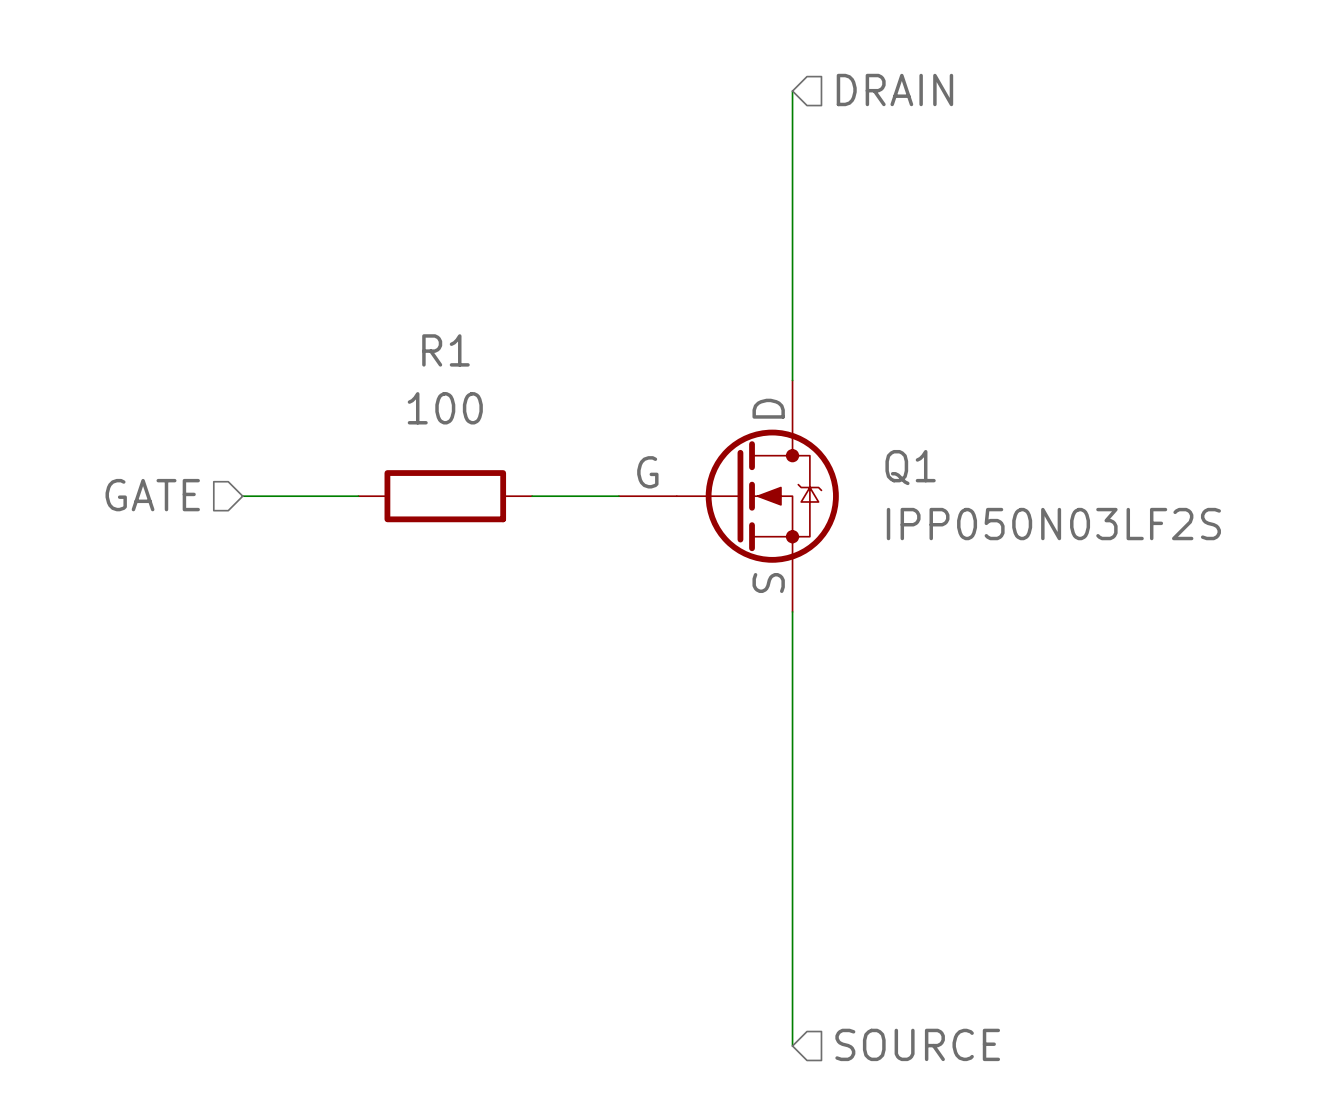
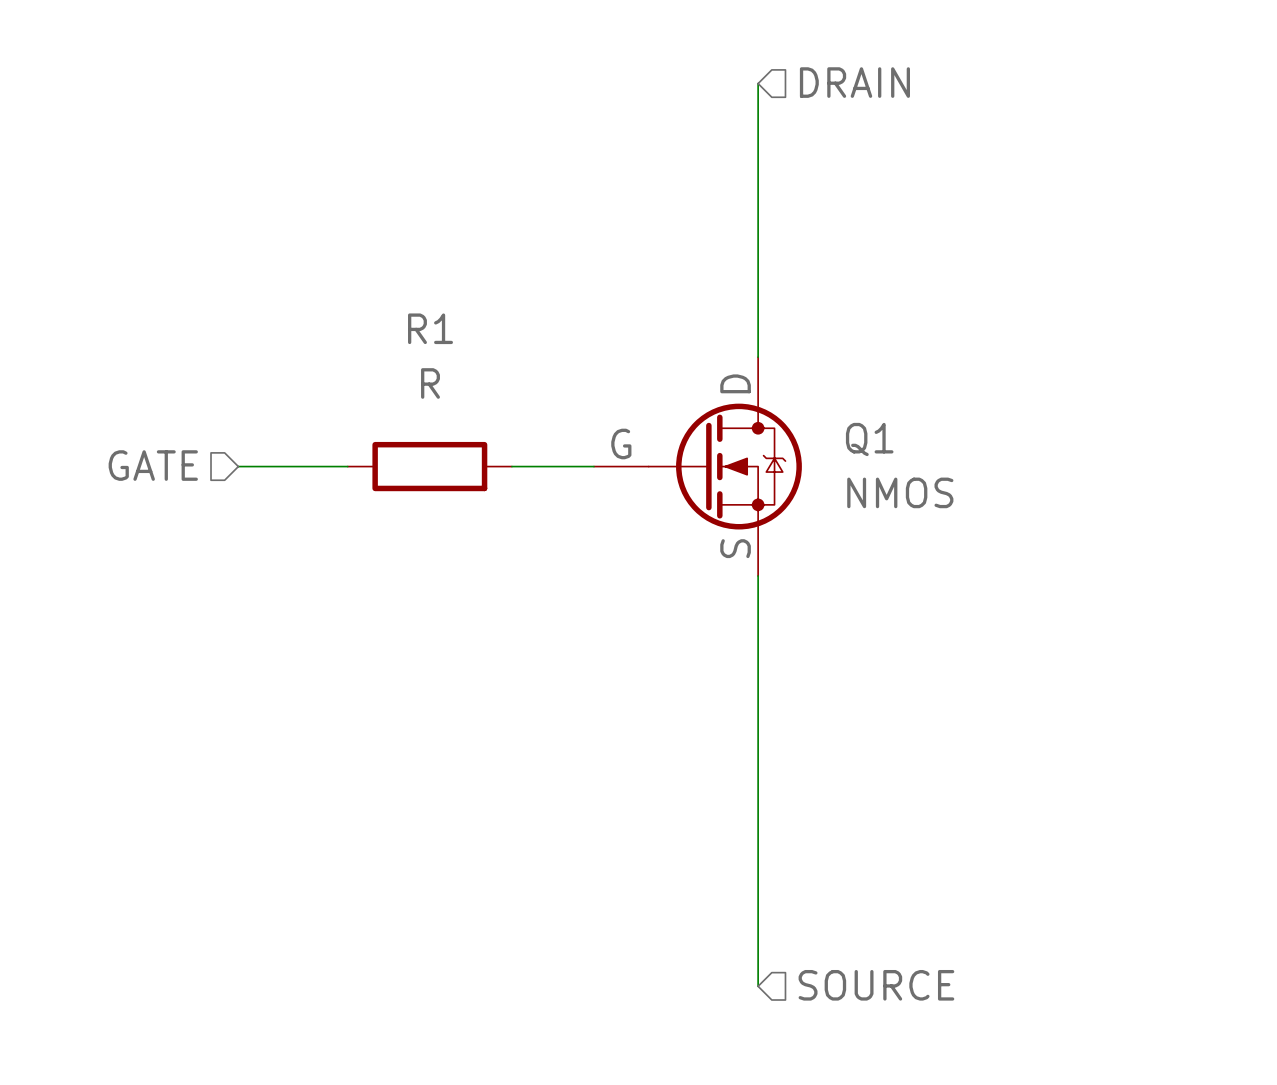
R1 value: 100 (445, 408) -> R (430, 383)
Q1 value: IPP050N03LF2S (1053, 524) -> NMOS (900, 492)

